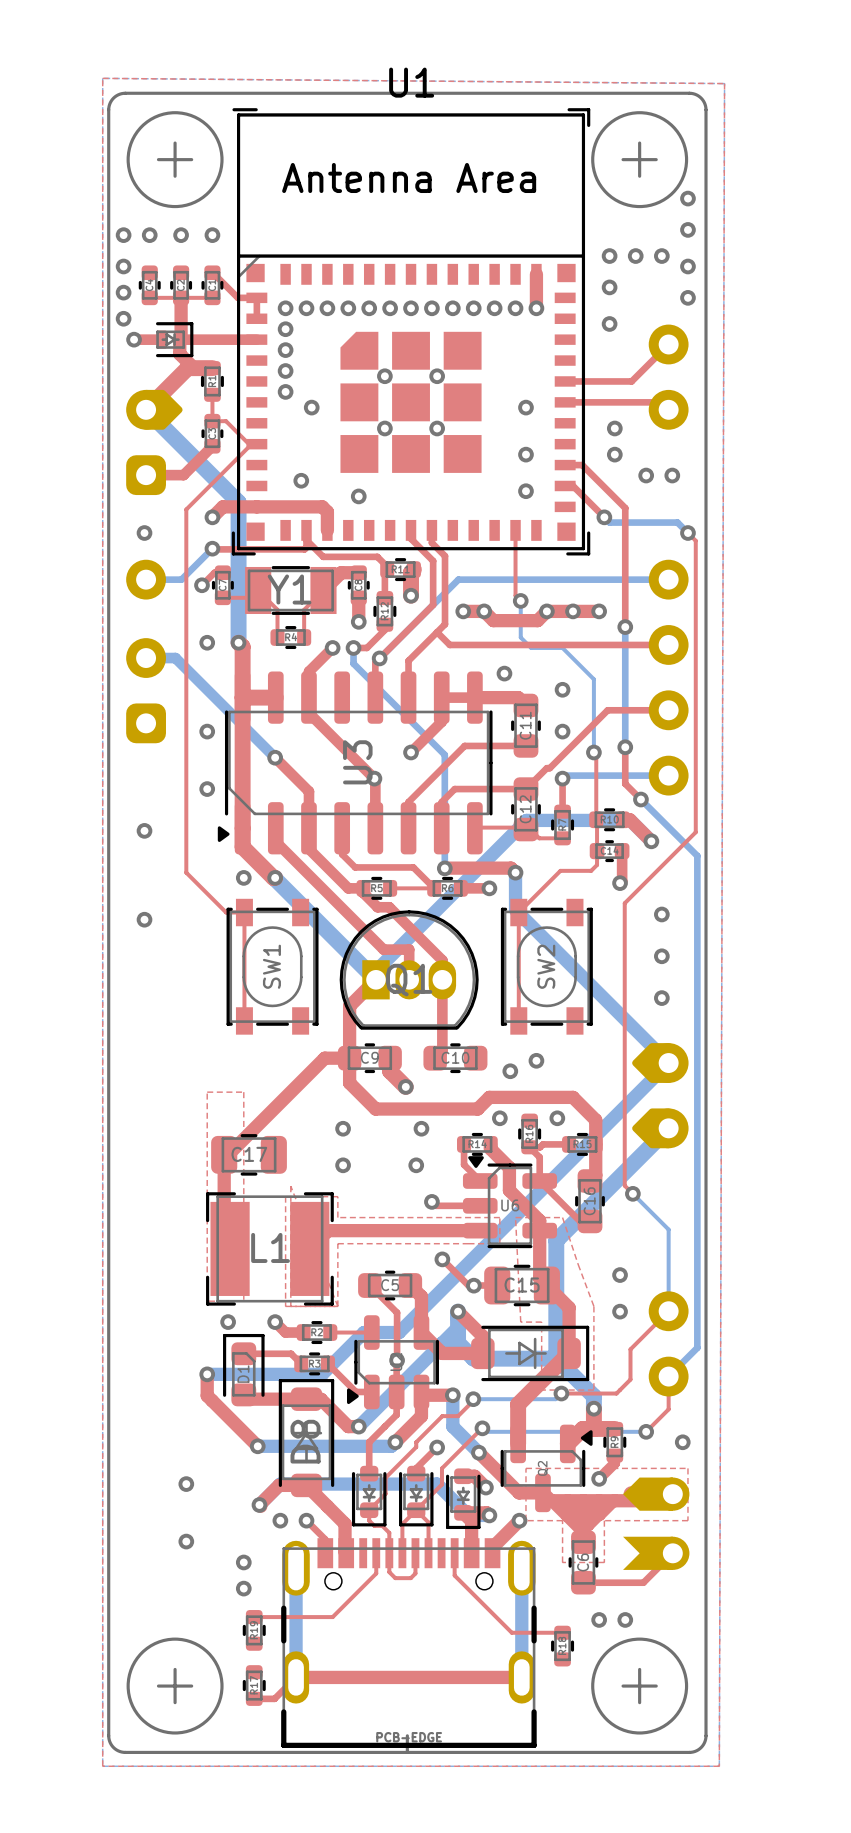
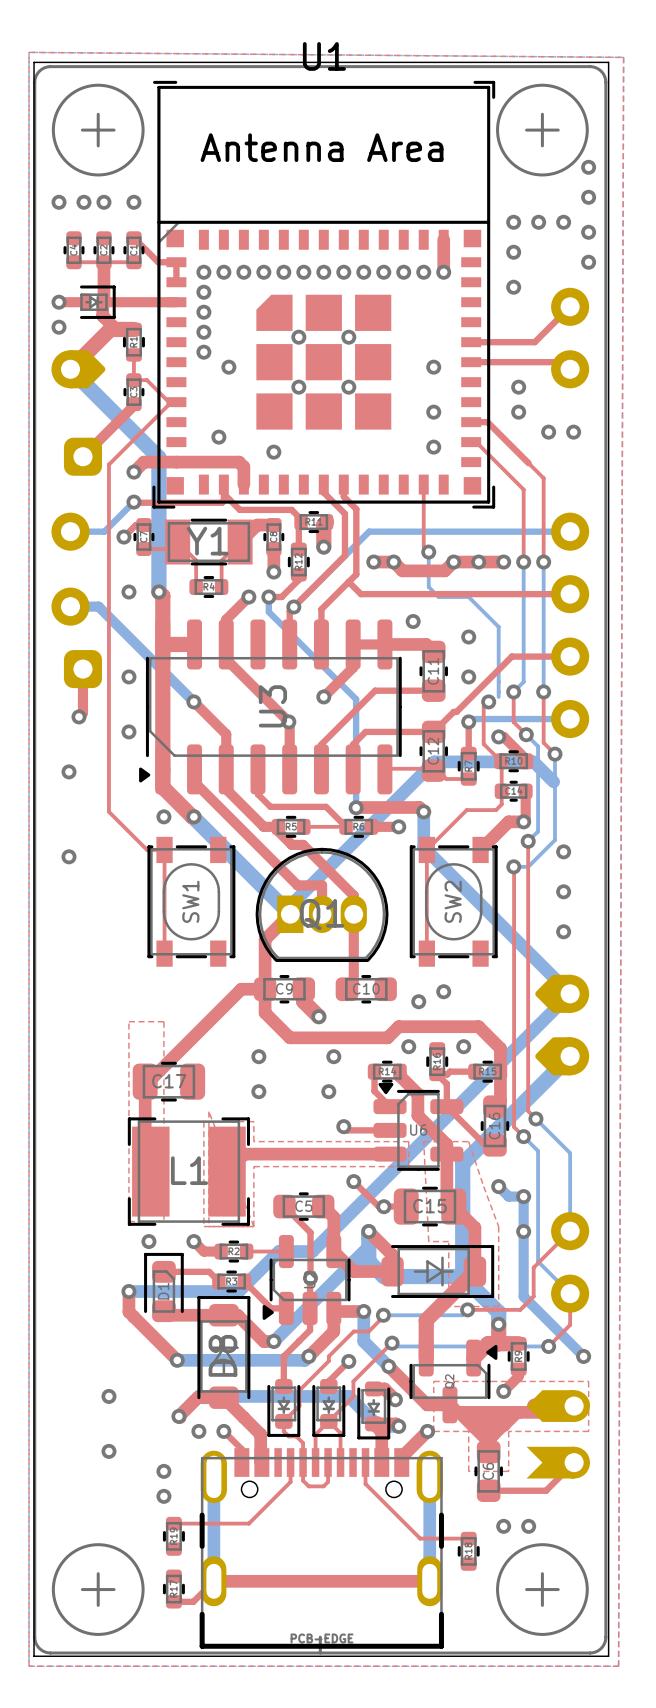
board edge: none -> (34, 62) (34, 1656) (608, 1656) (608, 62) (34, 62)
part footprint: [107, 91, 708, 1754] -> [33, 65, 608, 1655]
via: (123, 235) -> none
via: none -> (59, 202)
via: (149, 235) -> none
via: none -> (83, 202)
via: (123, 266) -> none
via: (123, 292) -> none
via: (123, 318) -> none
via: none -> (59, 327)
top track: (212, 446) (183, 475) (146, 475) -> (133, 404) (82, 456)
top track: (570, 485) (573, 485) (604, 517) -> (476, 442) (523, 489) (523, 562)
top track: (625, 508) (625, 627) -> (528, 463) (543, 478) (543, 562)
bottom track: (604, 517) (609, 522) (677, 522) (687, 533) -> none
via: (604, 517) -> none
via: (144, 533) -> none
top track: (687, 533) (695, 540) (695, 832) (624, 903) -> none
via: (687, 533) -> none
bottom track: none -> (523, 562) (523, 681) (513, 691)
via: none -> (523, 562)
bottom track: none -> (543, 562) (543, 691)
via: none -> (543, 562)
bottom track: (625, 627) (625, 747) -> none
via: (625, 627) -> none
top track: none -> (82, 669) (82, 712) (78, 716)
top track: none -> (513, 691) (513, 722) (526, 734)
via: none -> (513, 691)
top track: (625, 747) (625, 783) (640, 799) -> none
via: (625, 747) -> none
top track: none -> (543, 691) (543, 742) (554, 754)
via: none -> (543, 691)
top track: (593, 752) (596, 754) (596, 819) -> (488, 701) (483, 706) (483, 744) (500, 761)
via: (593, 752) -> none
via: none -> (488, 701)
via: none -> (78, 716)
bottom track: none -> (526, 734) (538, 746) (538, 831) (528, 841)
via: none -> (526, 734)
via: none -> (498, 736)
bottom track: (640, 799) (697, 855) (697, 1347) (668, 1376) -> (523, 1136) (538, 1151) (538, 1261) (570, 1293)
via position: (640, 799) -> (554, 754)
bottom track: none -> (554, 754) (554, 840) (528, 866) (513, 866)
top track: (622, 819) (629, 819) (651, 841) -> (526, 761) (503, 736) (498, 736)
via: (651, 841) -> none
top track: none -> (523, 821) (508, 821) (480, 849)
via: none -> (528, 841)
via: none -> (513, 866)
top track: none -> (514, 867) (514, 1127) (523, 1136)
via: none -> (523, 1136)
bottom track: none -> (498, 1186) (508, 1196) (523, 1196) (523, 1296) (583, 1356)
via: none -> (498, 1186)

